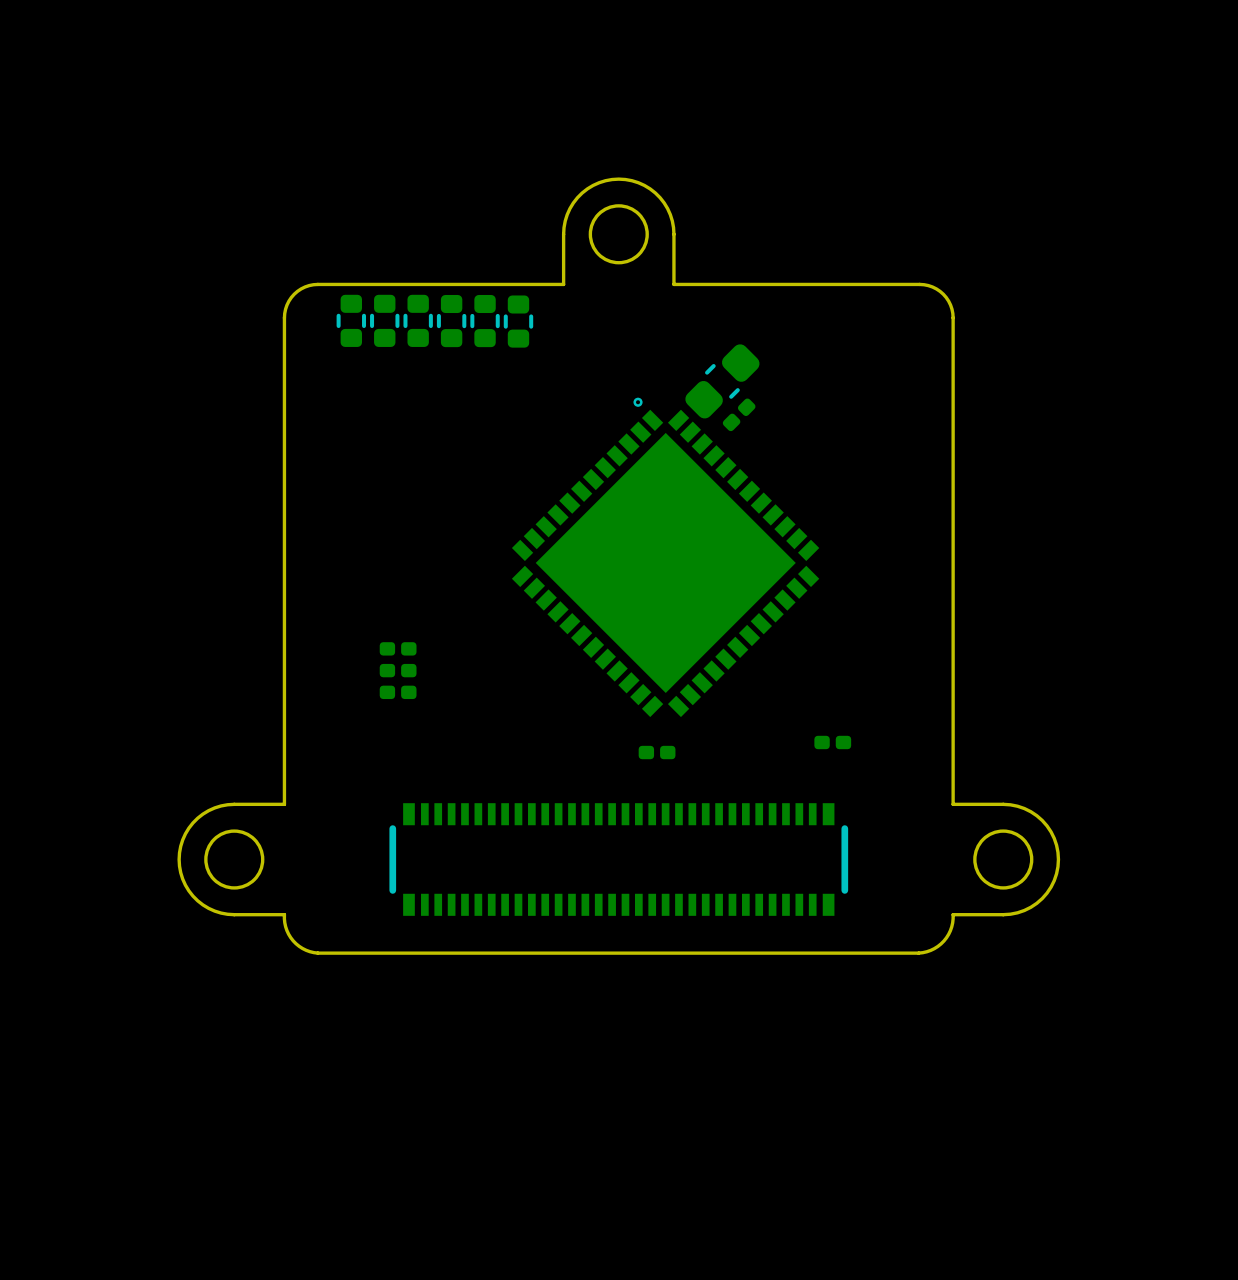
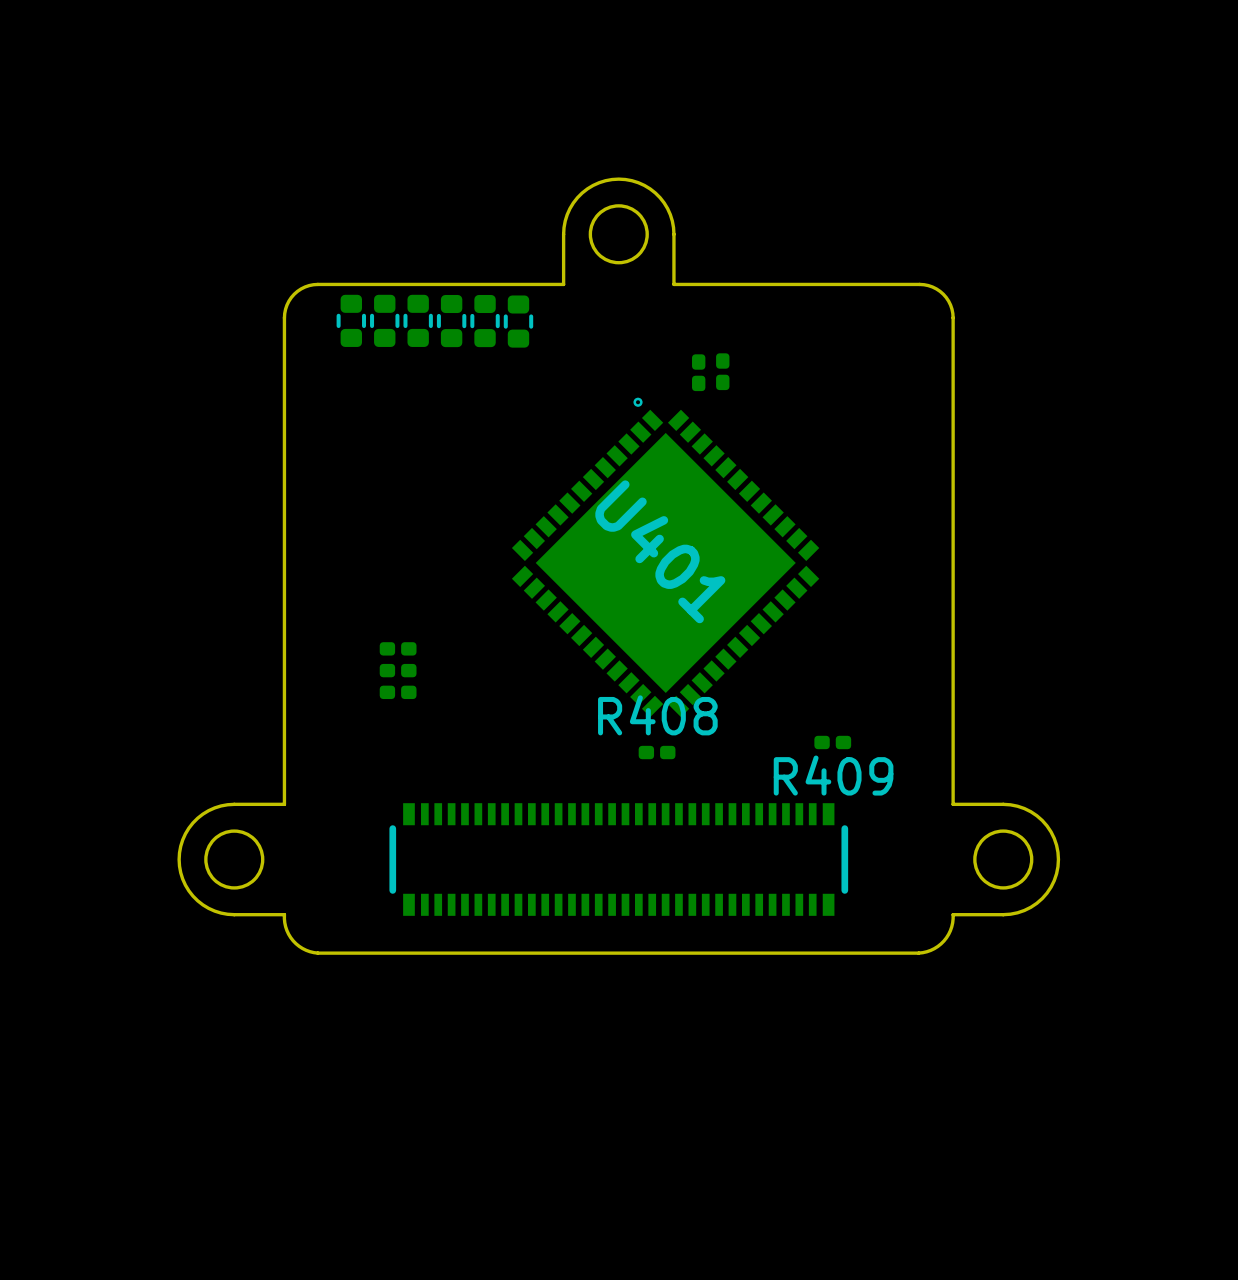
part footprint: [685, 344, 760, 419] -> [716, 353, 730, 391]
part: none -> (698, 372)
part: (739, 414) -> none
U401 name: none -> U401 (660, 551)
R408 name: none -> R408 (657, 715)
R409 name: none -> R409 (833, 775)

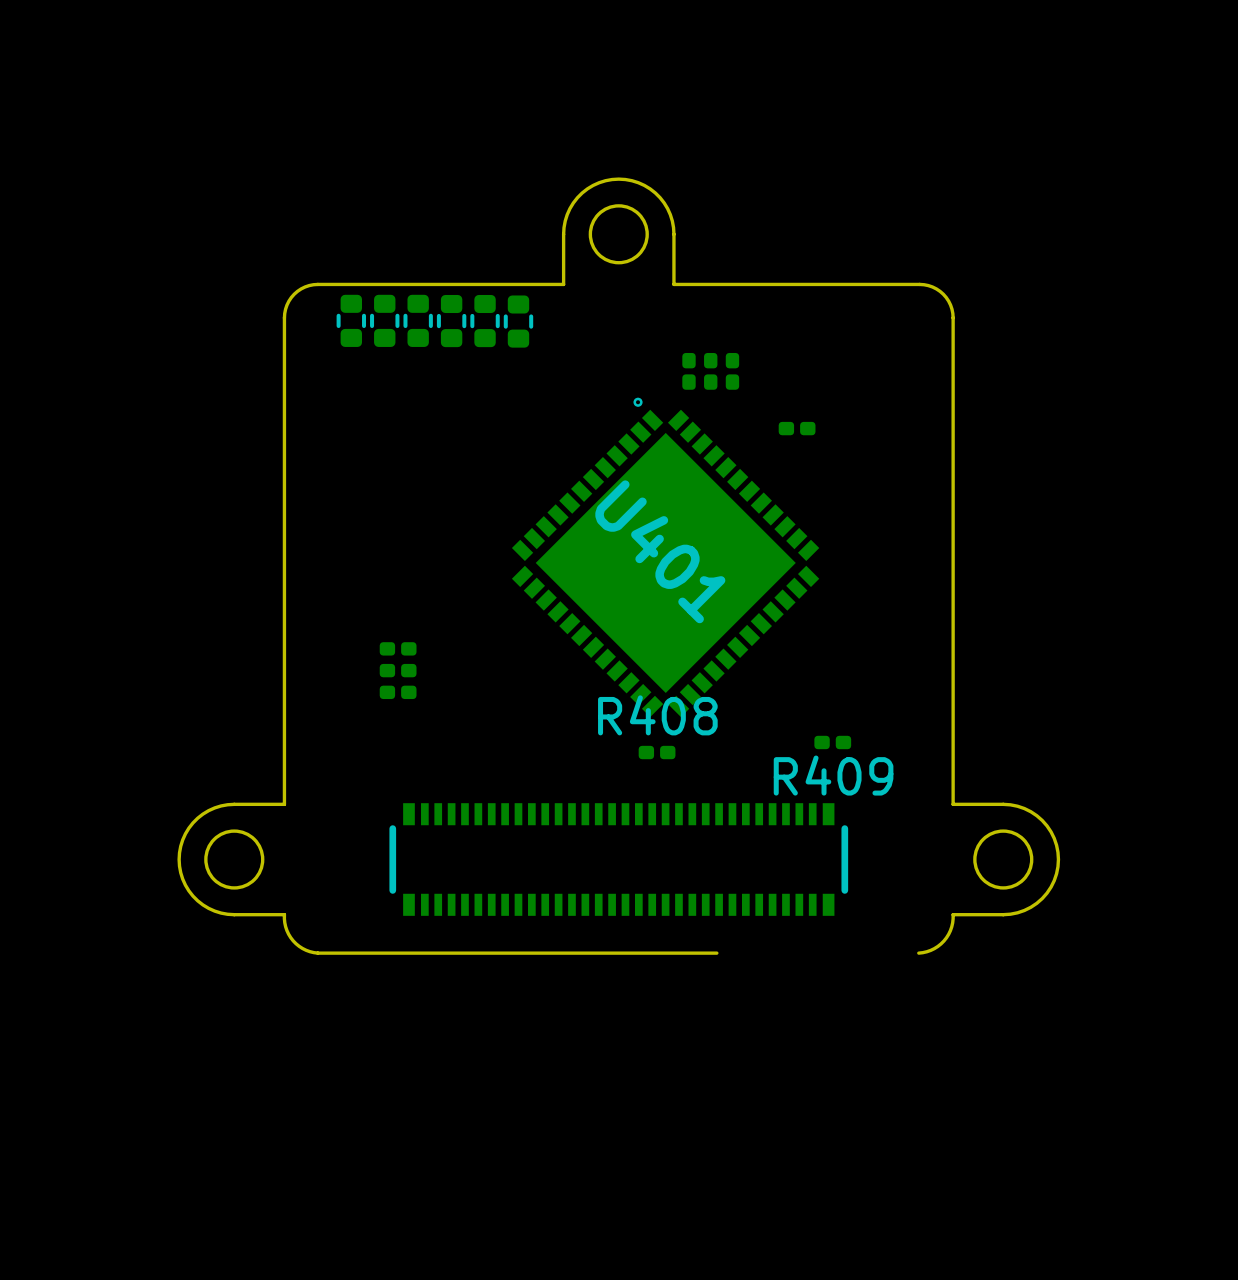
part: none -> (688, 371)
part: none -> (710, 371)
part: (722, 371) -> none
part: none -> (732, 371)
part: (698, 372) -> none
part: none -> (797, 428)
board edge: (918, 953) (716, 953) -> none

